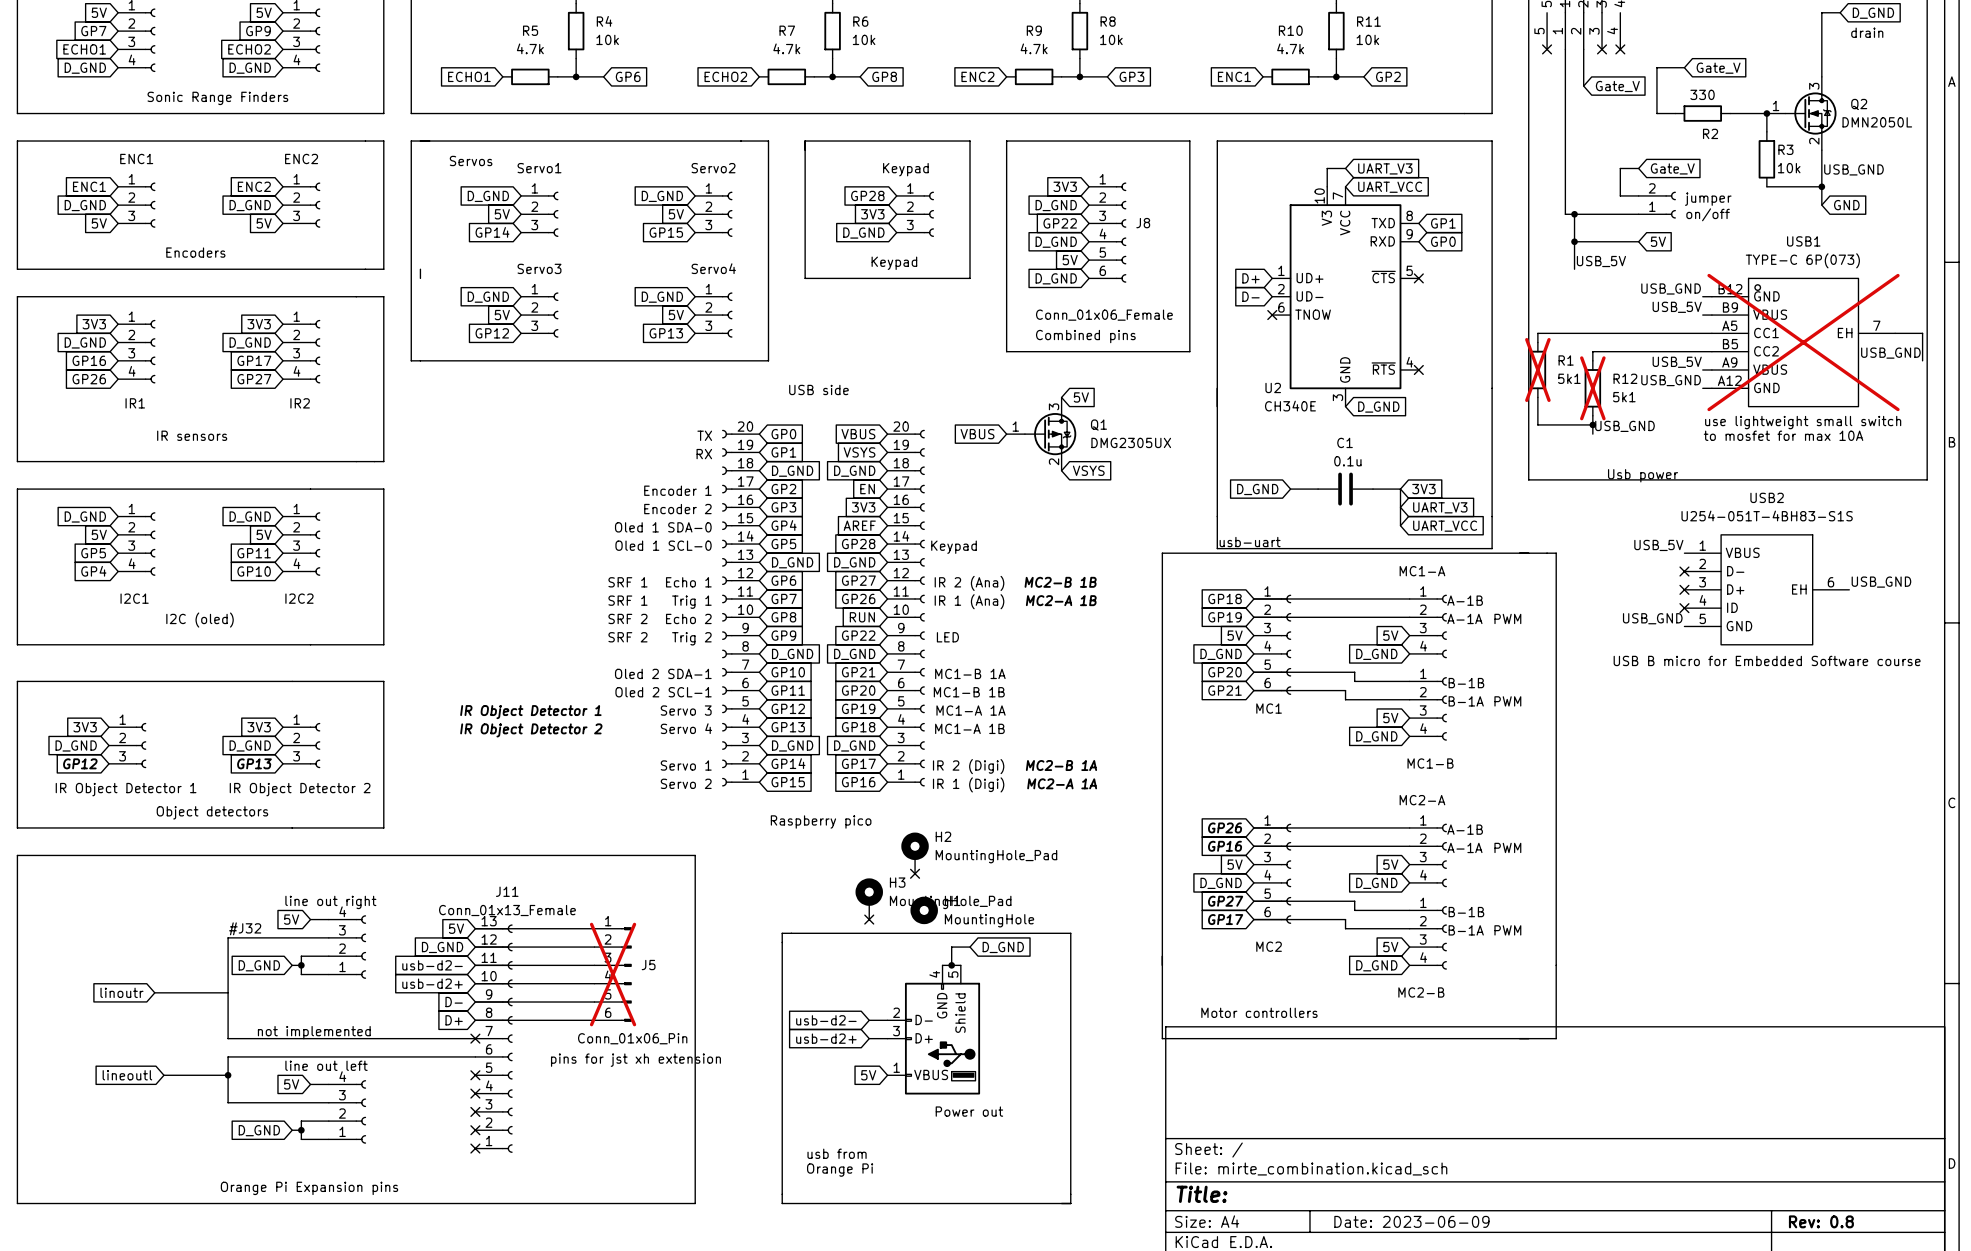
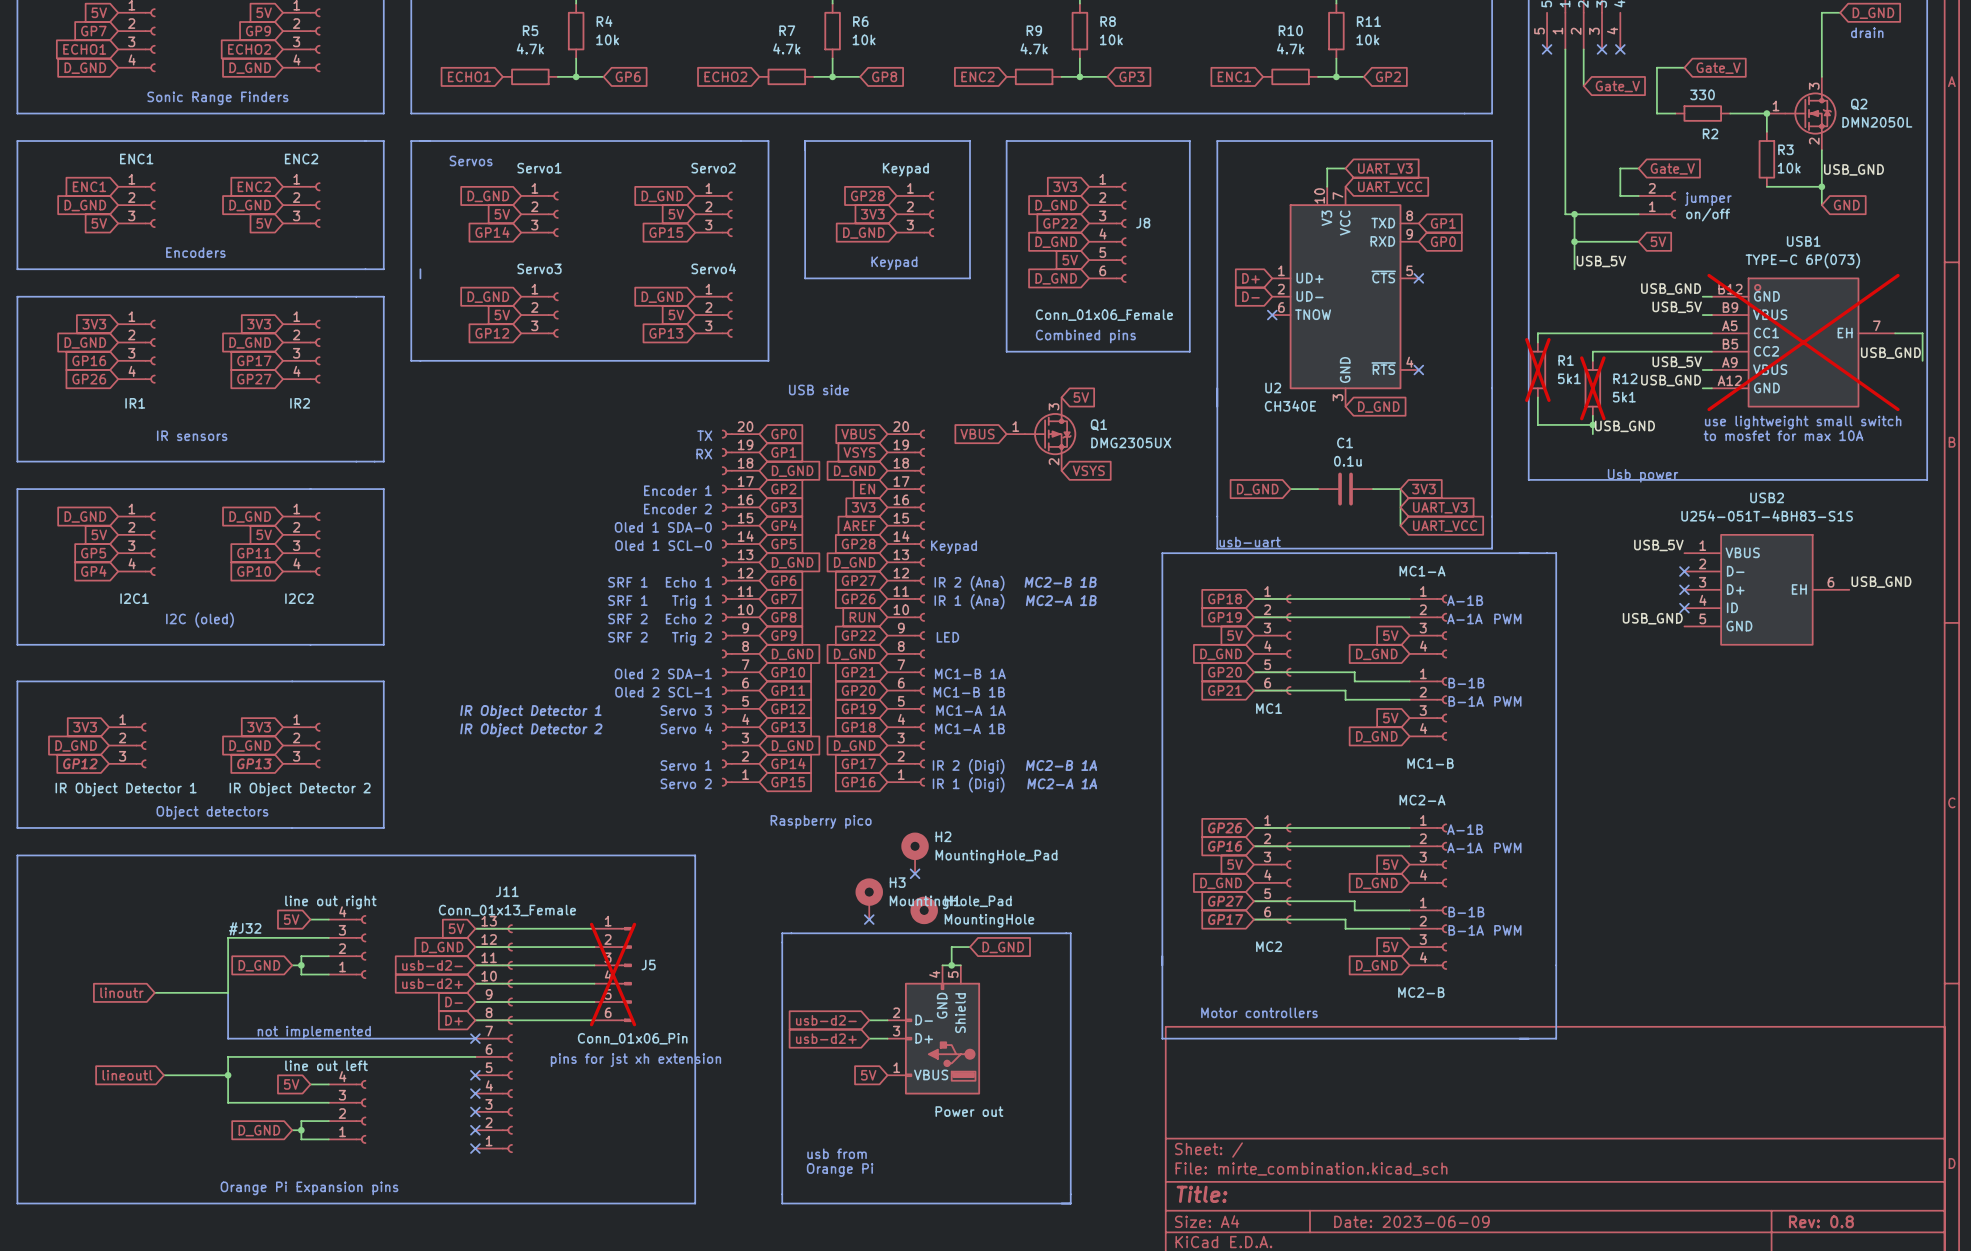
text: USB B micro for Embedded Software course (1767, 660) -> none

